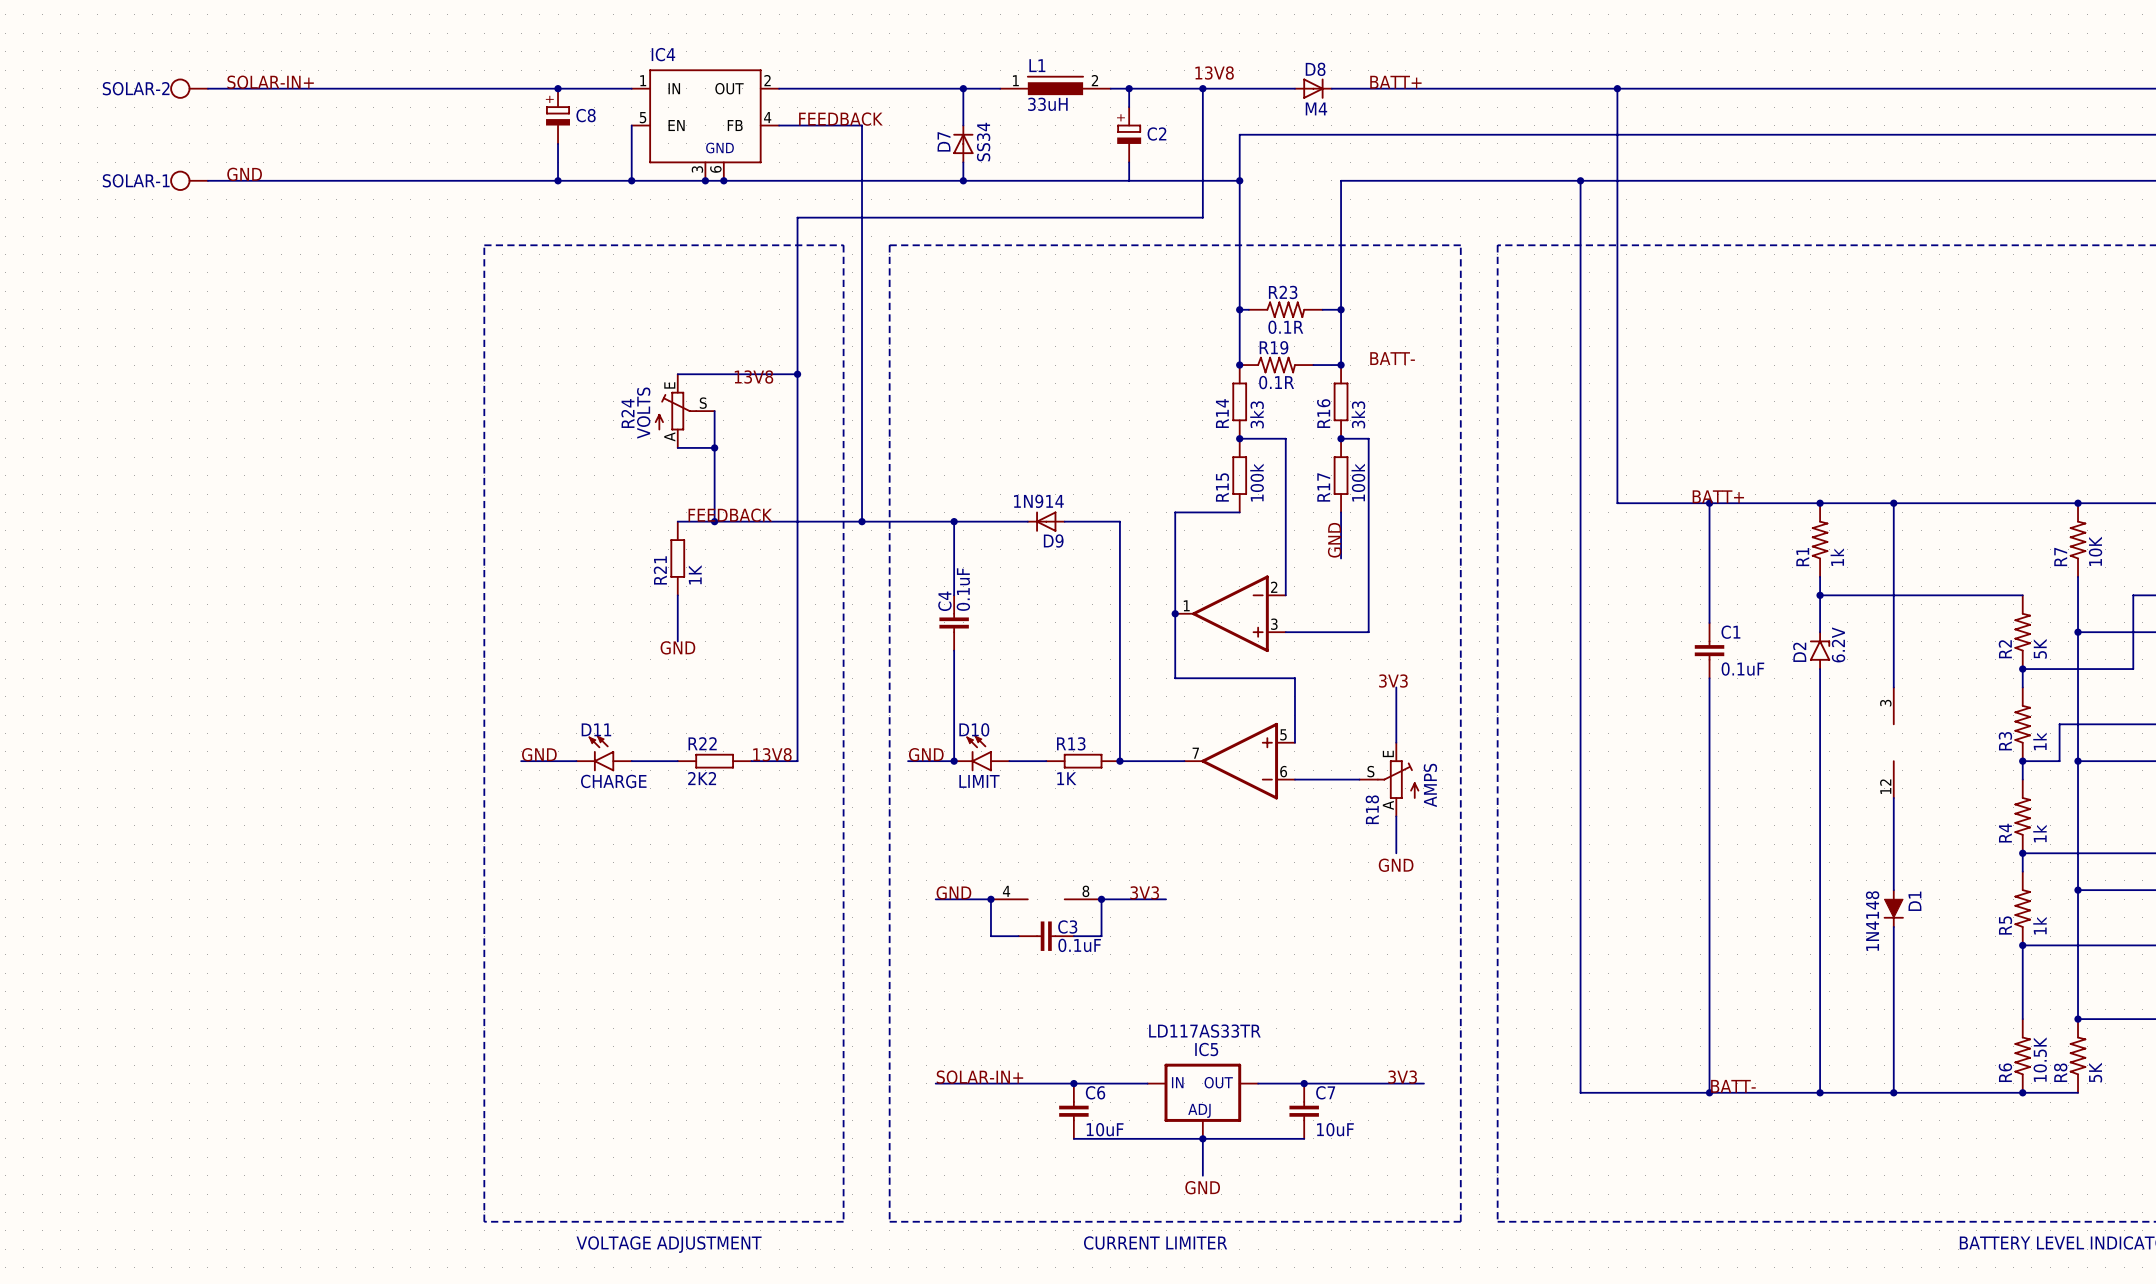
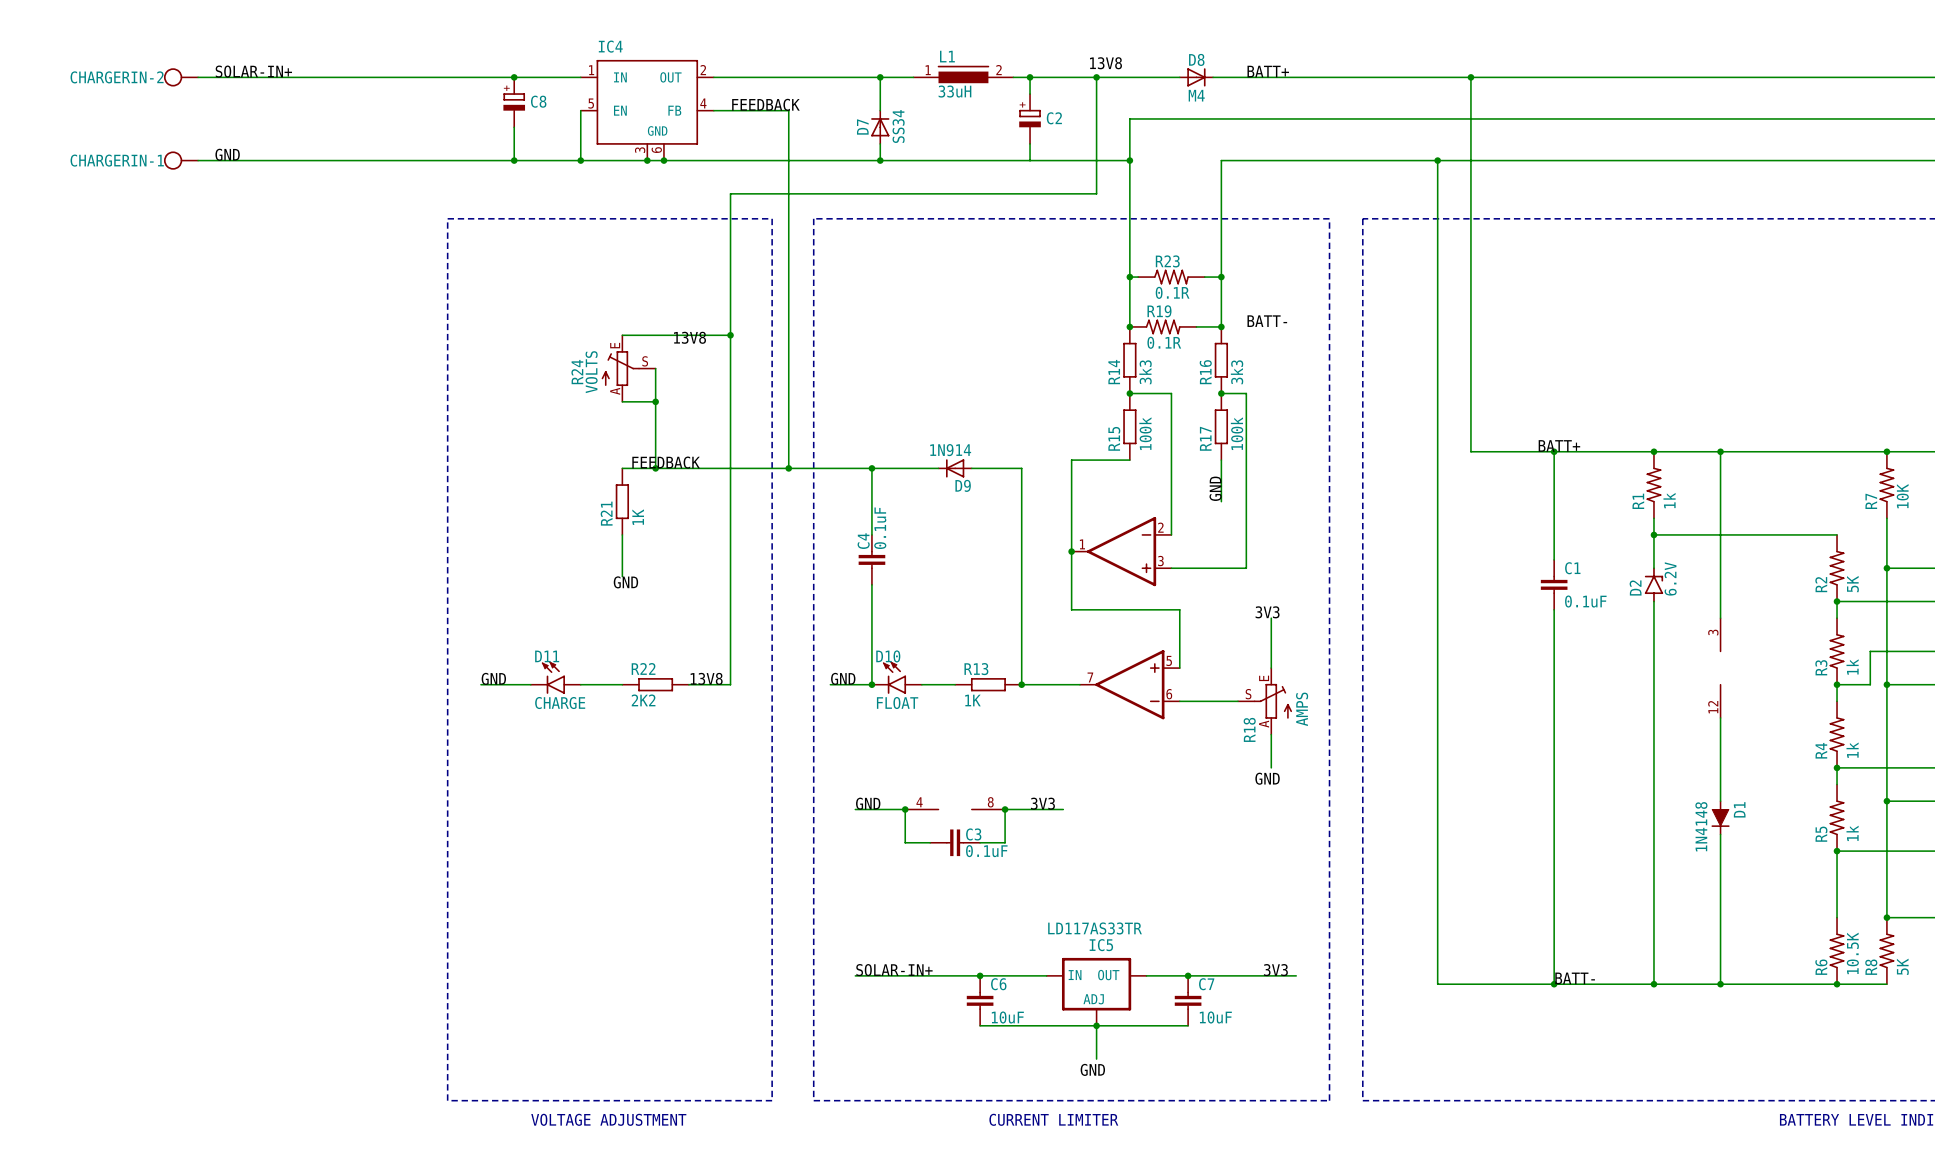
SOLAR-2 name: SOLAR-2 (136, 88) -> CHARGERIN-2 (117, 77)
SOLAR-1 name: SOLAR-1 (136, 180) -> CHARGERIN-1 (117, 160)
D10 value: LIMIT (979, 781) -> FLOAT (897, 703)

